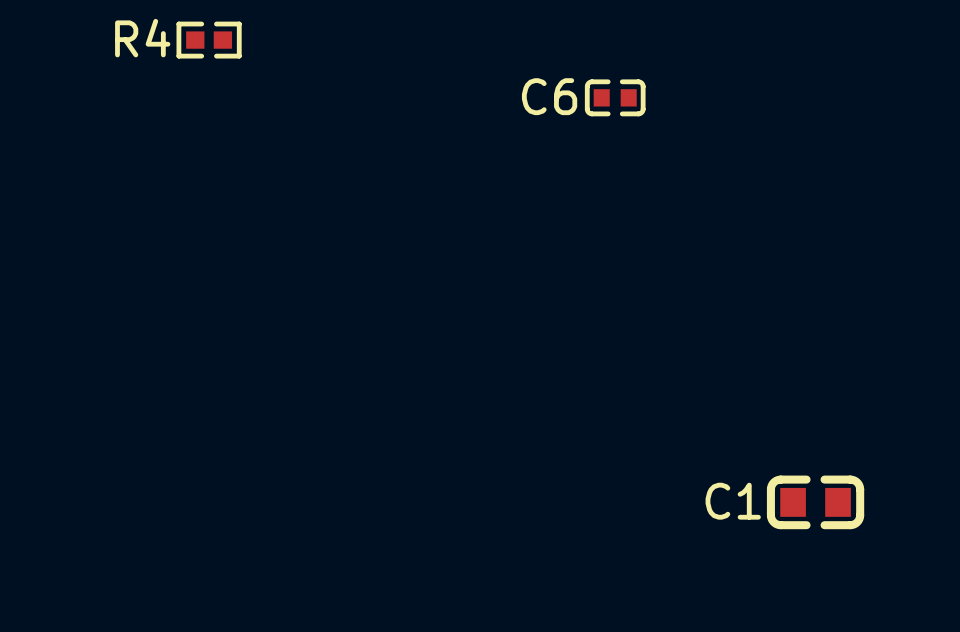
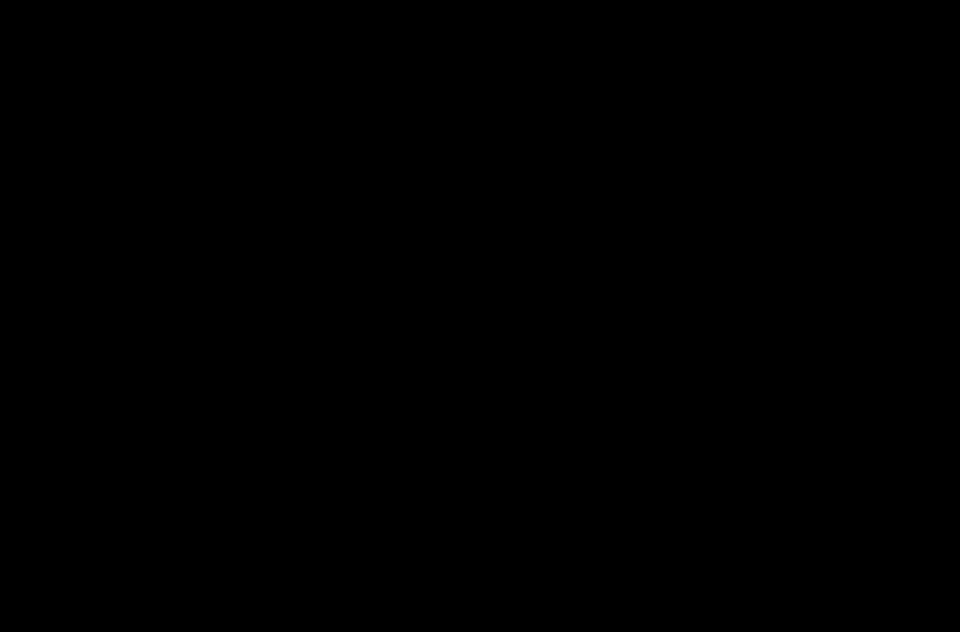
R4: (209, 40) -> none
C6: (615, 97) -> none
C1: (815, 502) -> none

